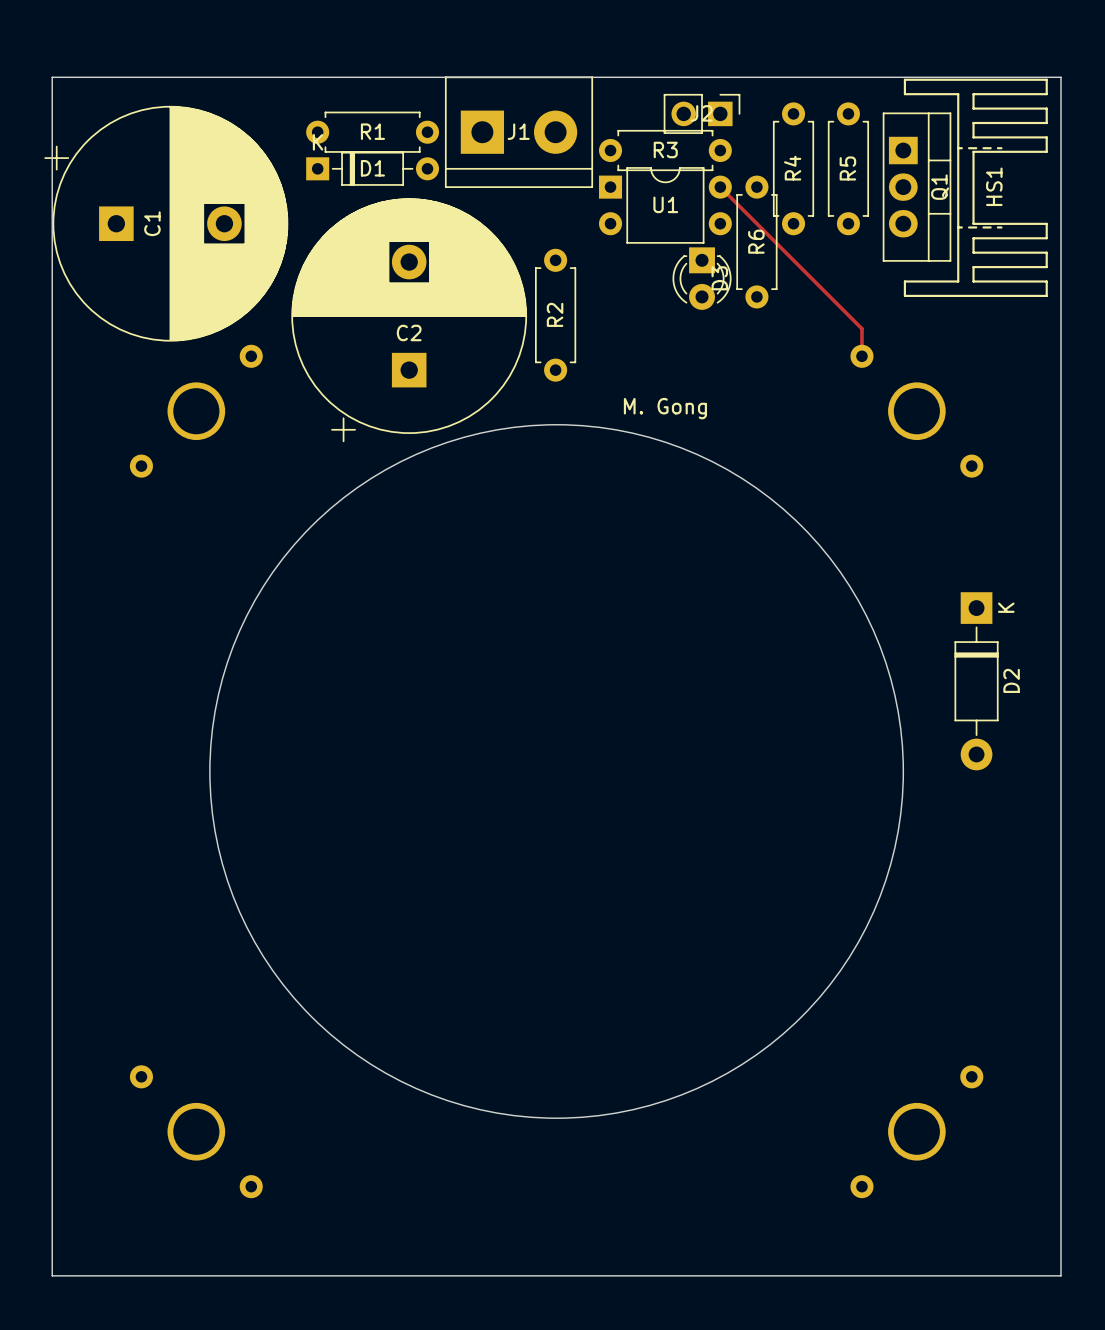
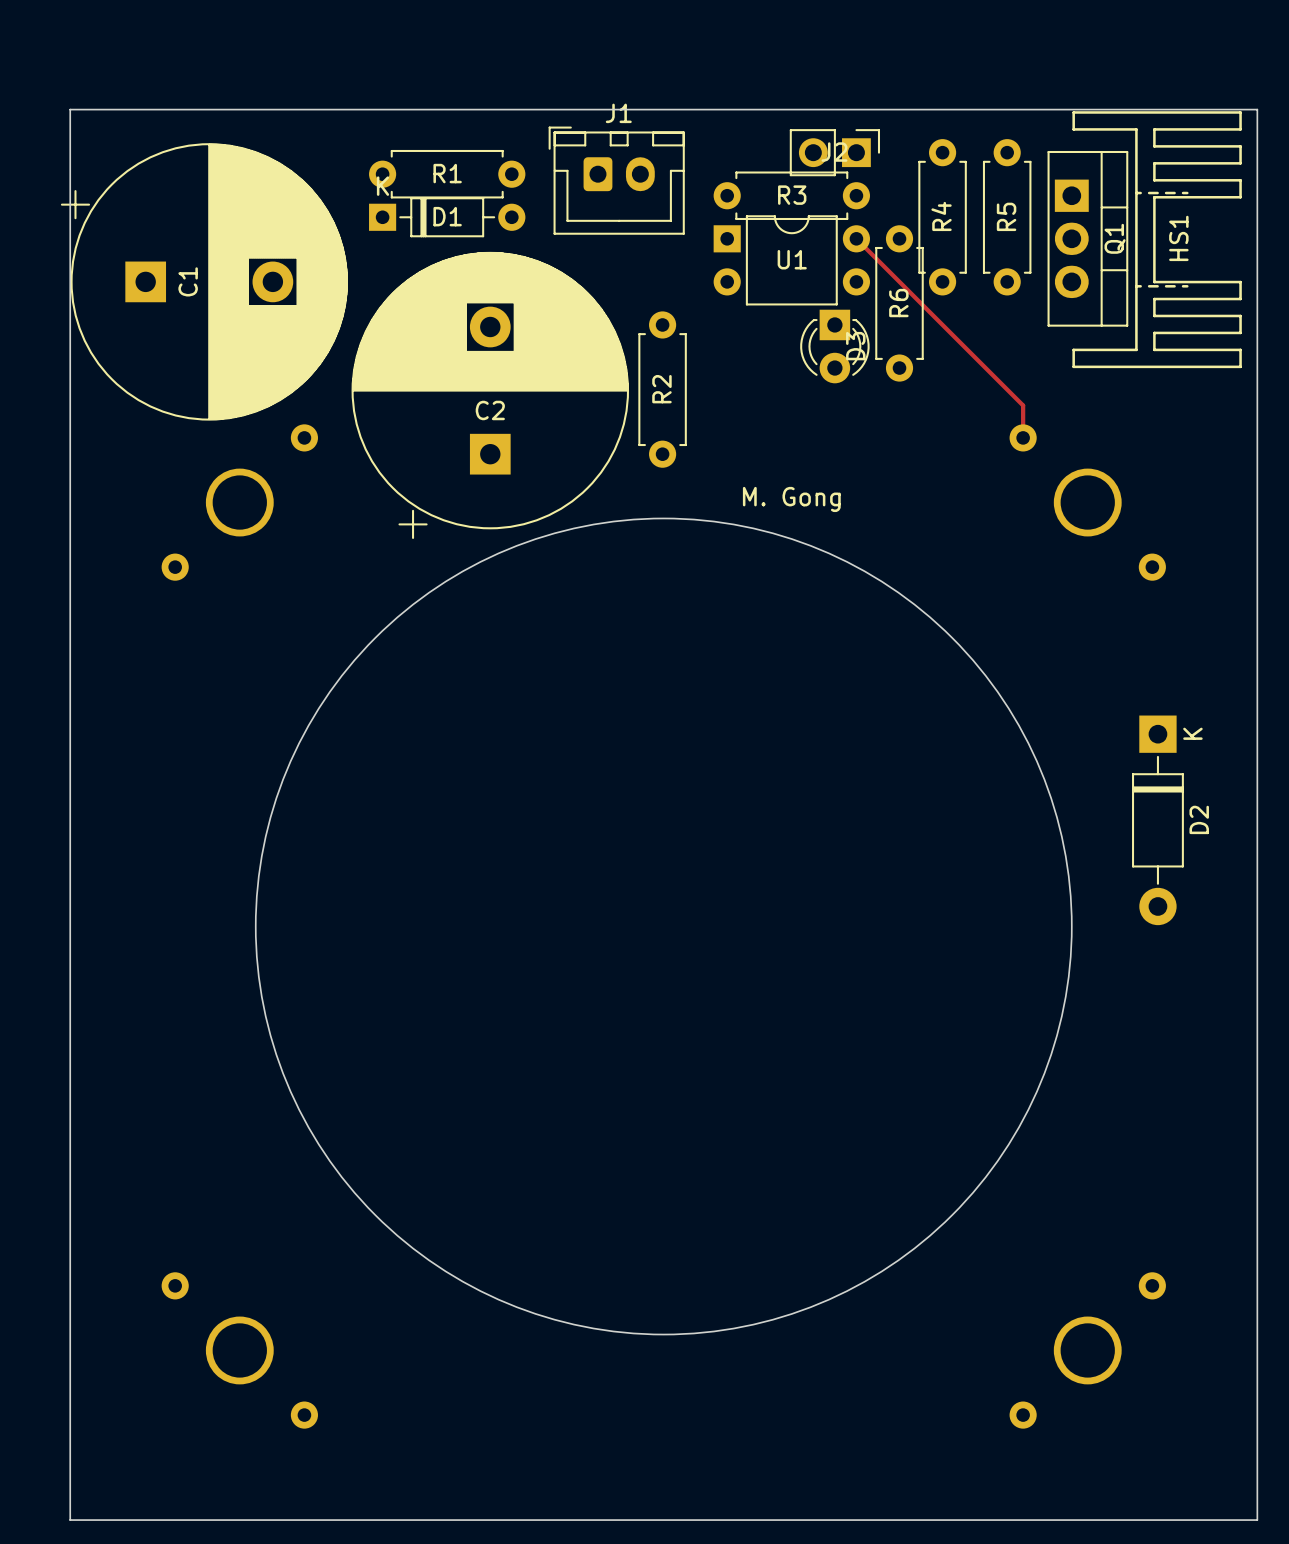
J1 footprint: [444, 76, 594, 188] -> [548, 126, 685, 235]
J1 name position: J1 (518, 131) -> J1 (618, 113)

